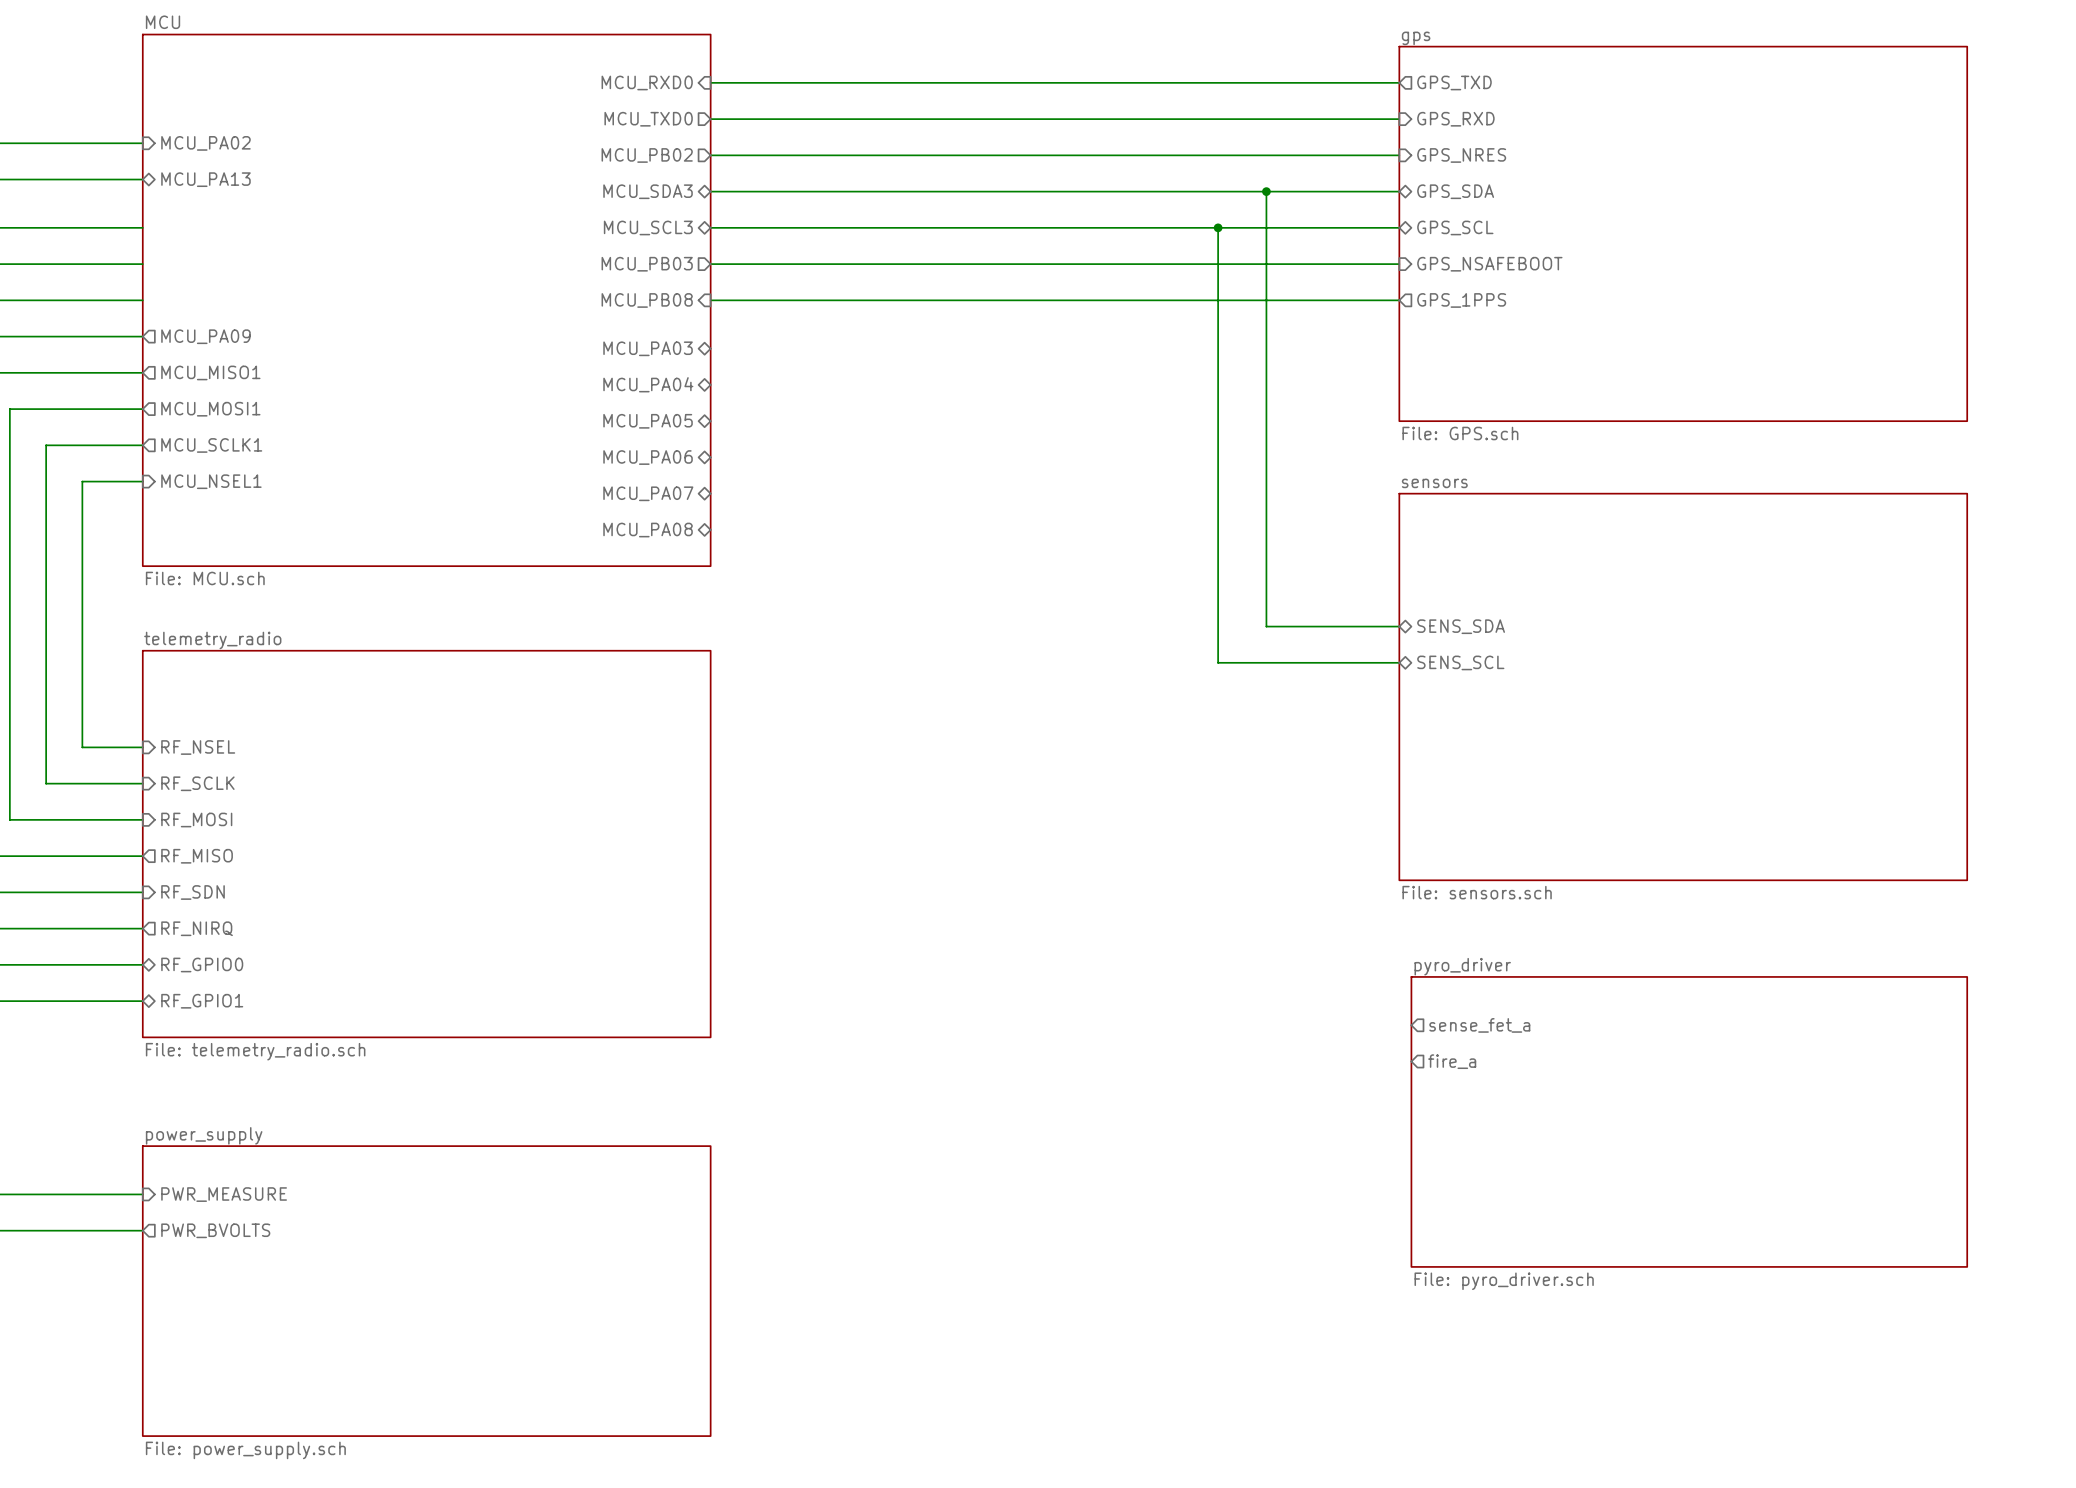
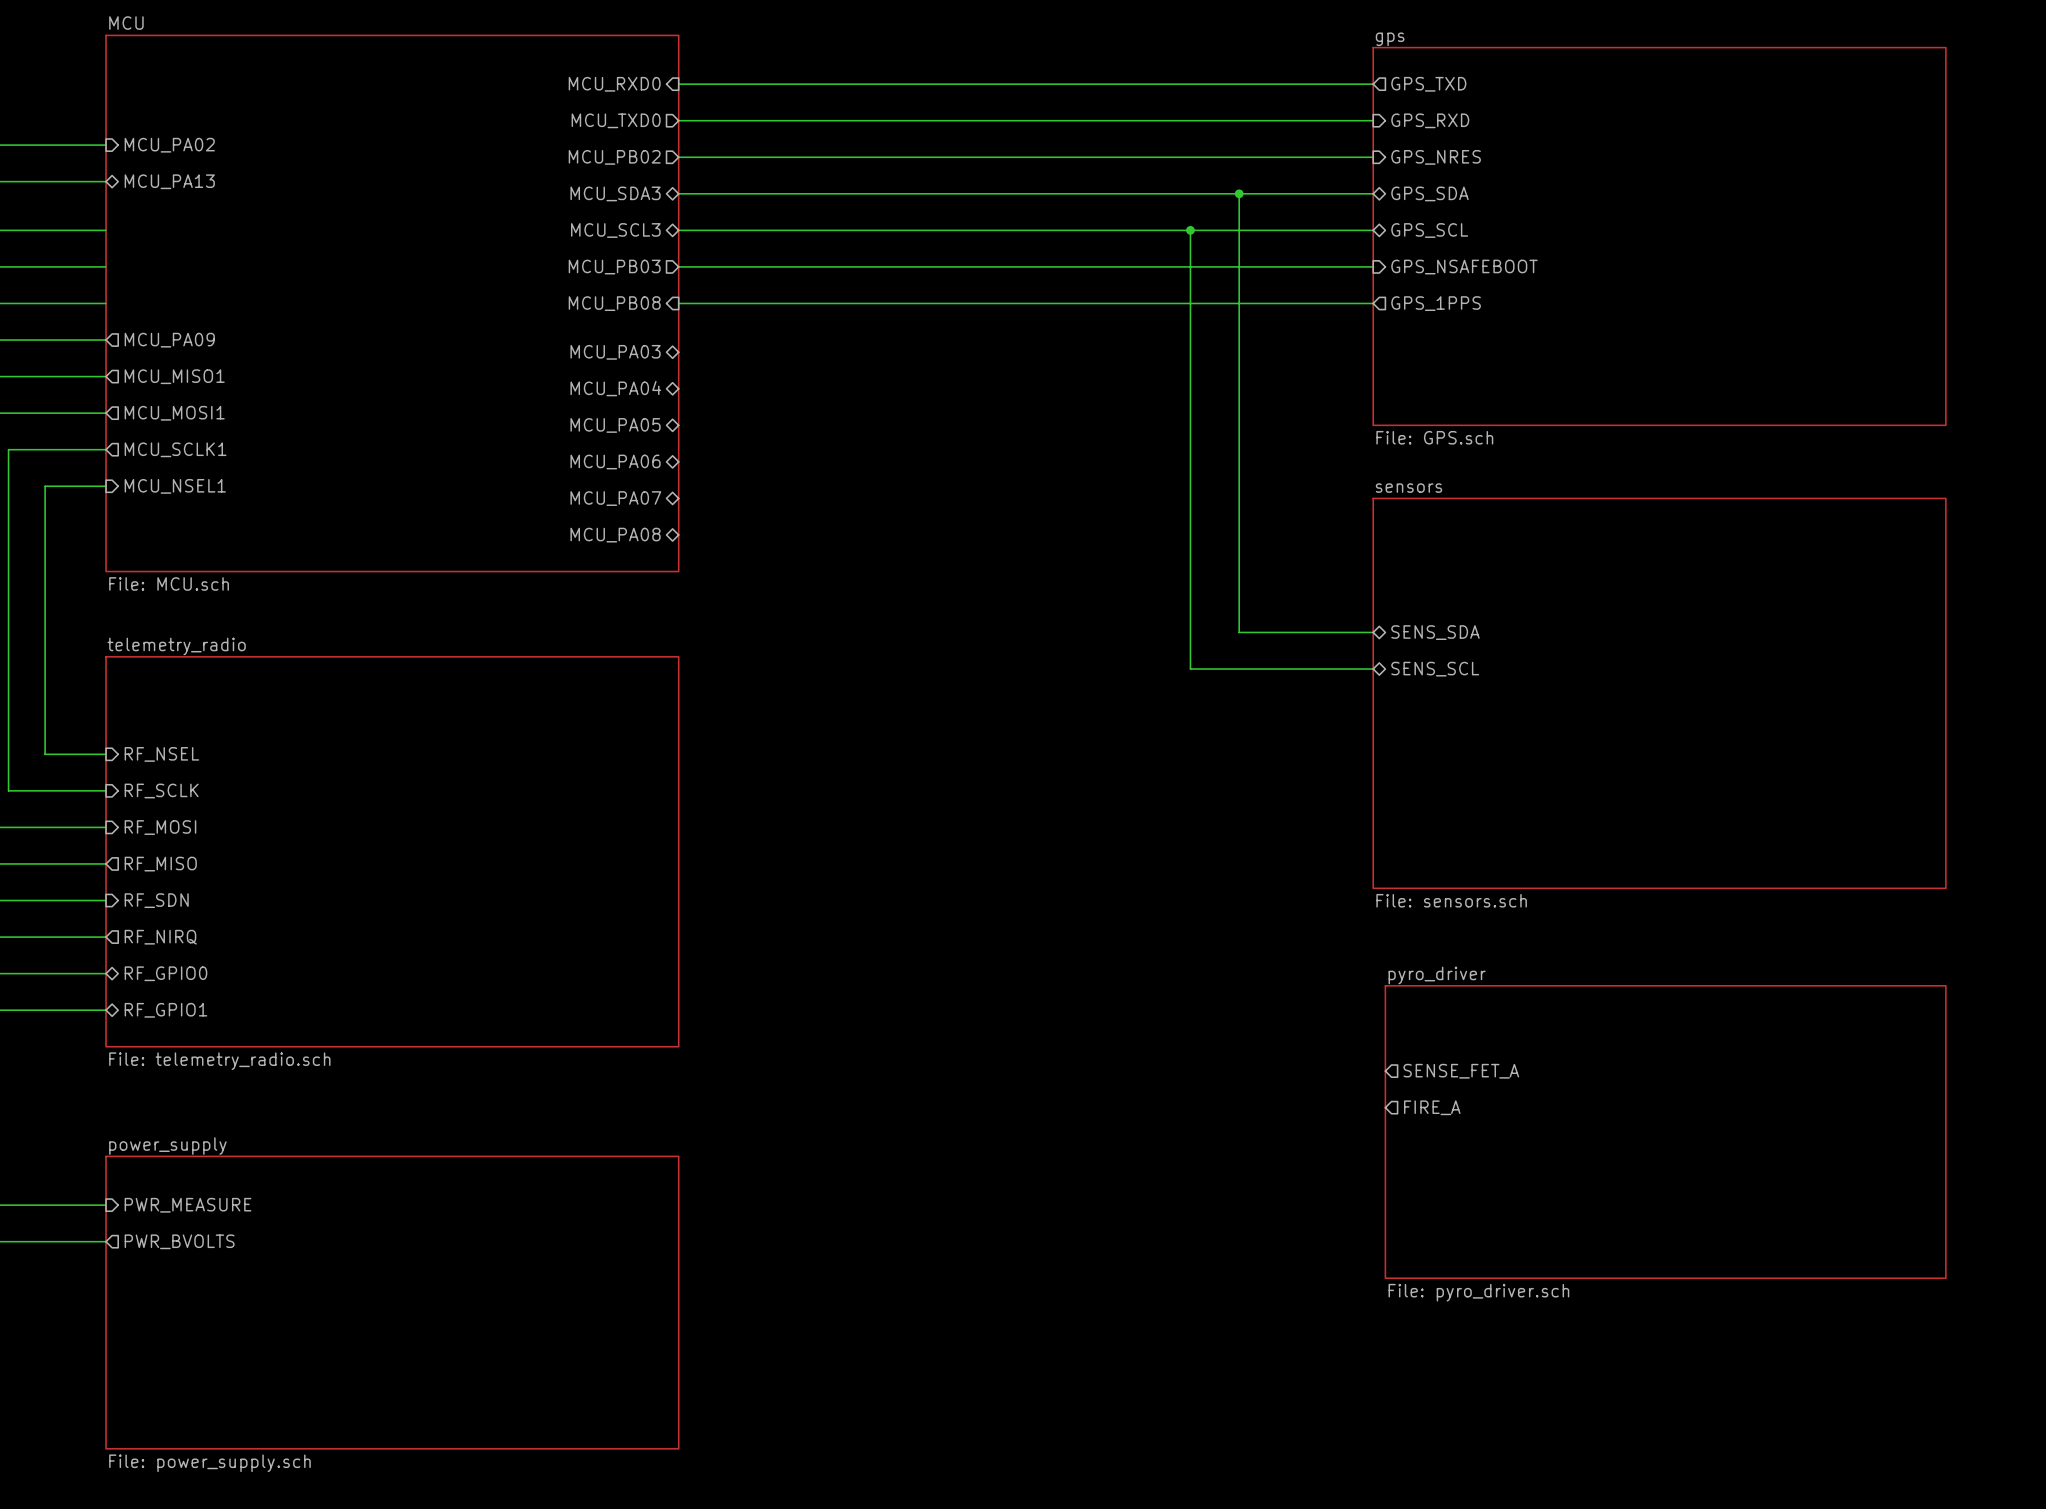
sheet pin: sense_fet_a (1479, 1025) -> none
sheet pin: fire_a (1452, 1061) -> SENSE_FET_A (1461, 1071)
sheet pin: none -> FIRE_A (1432, 1107)

